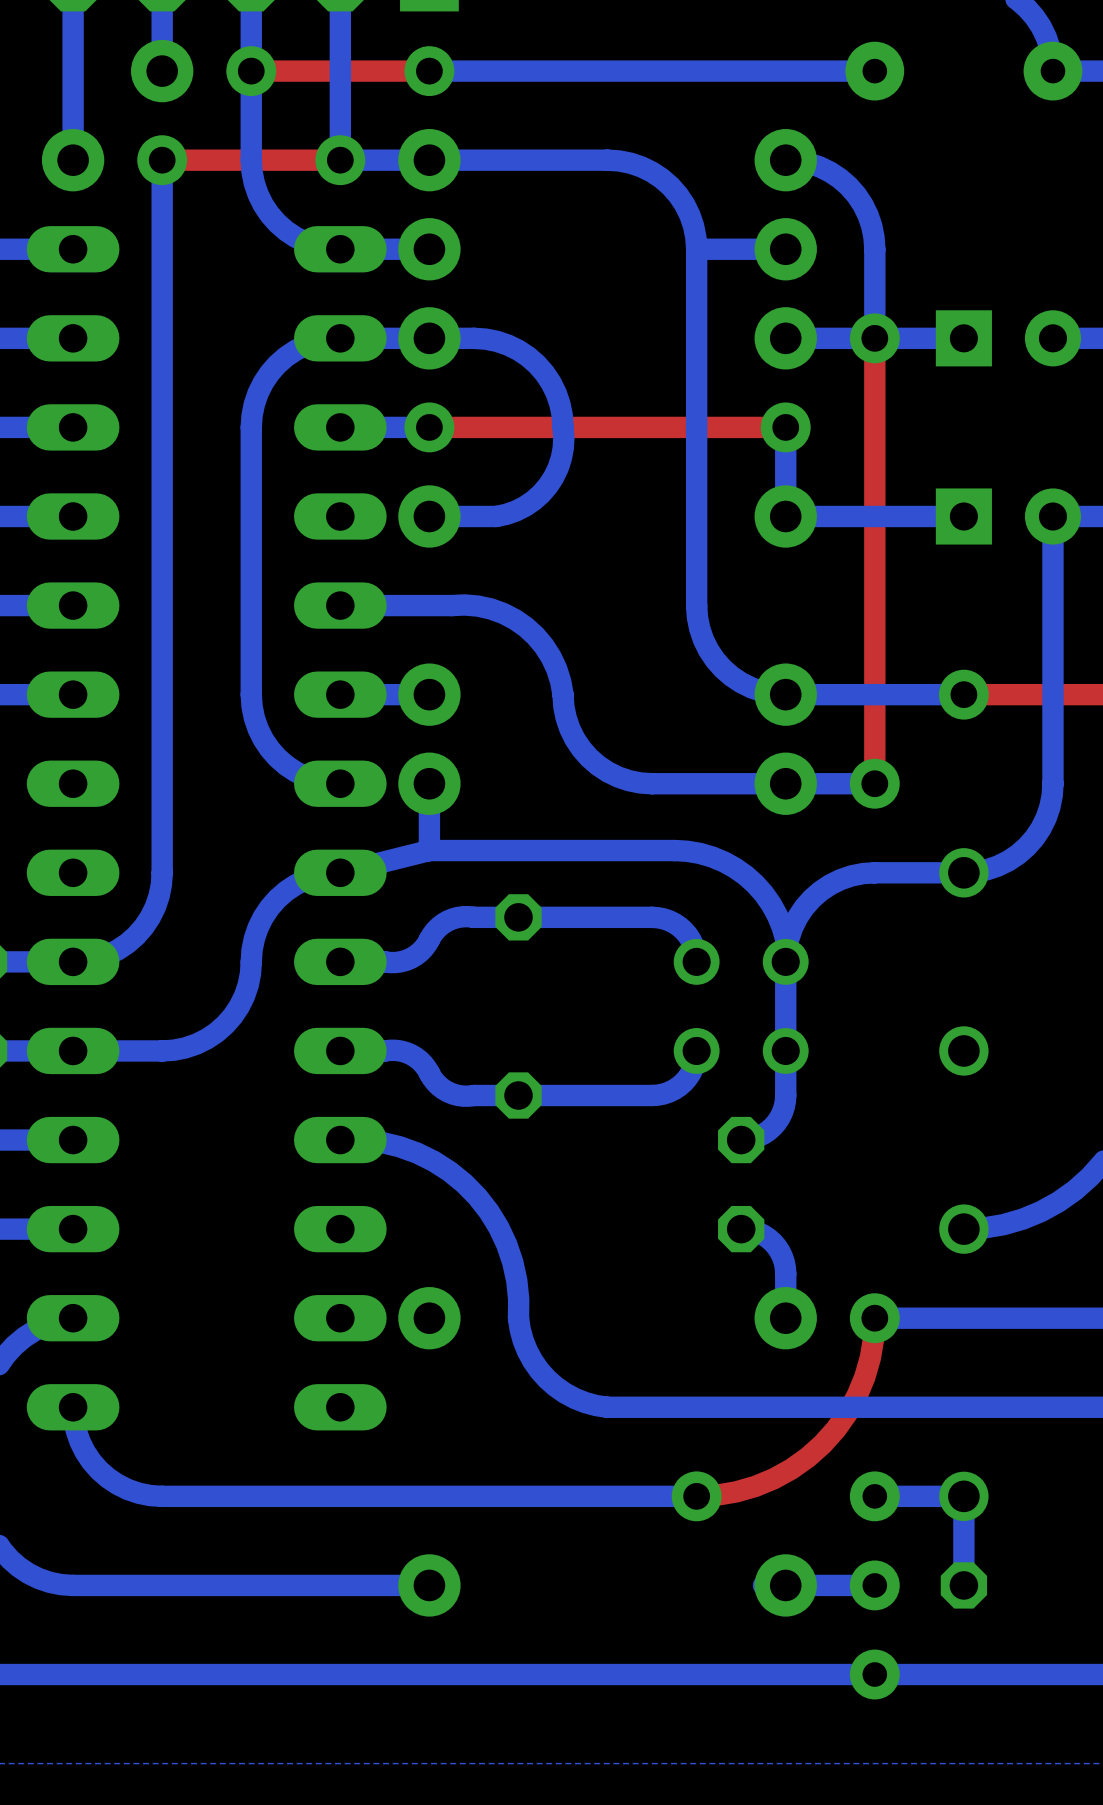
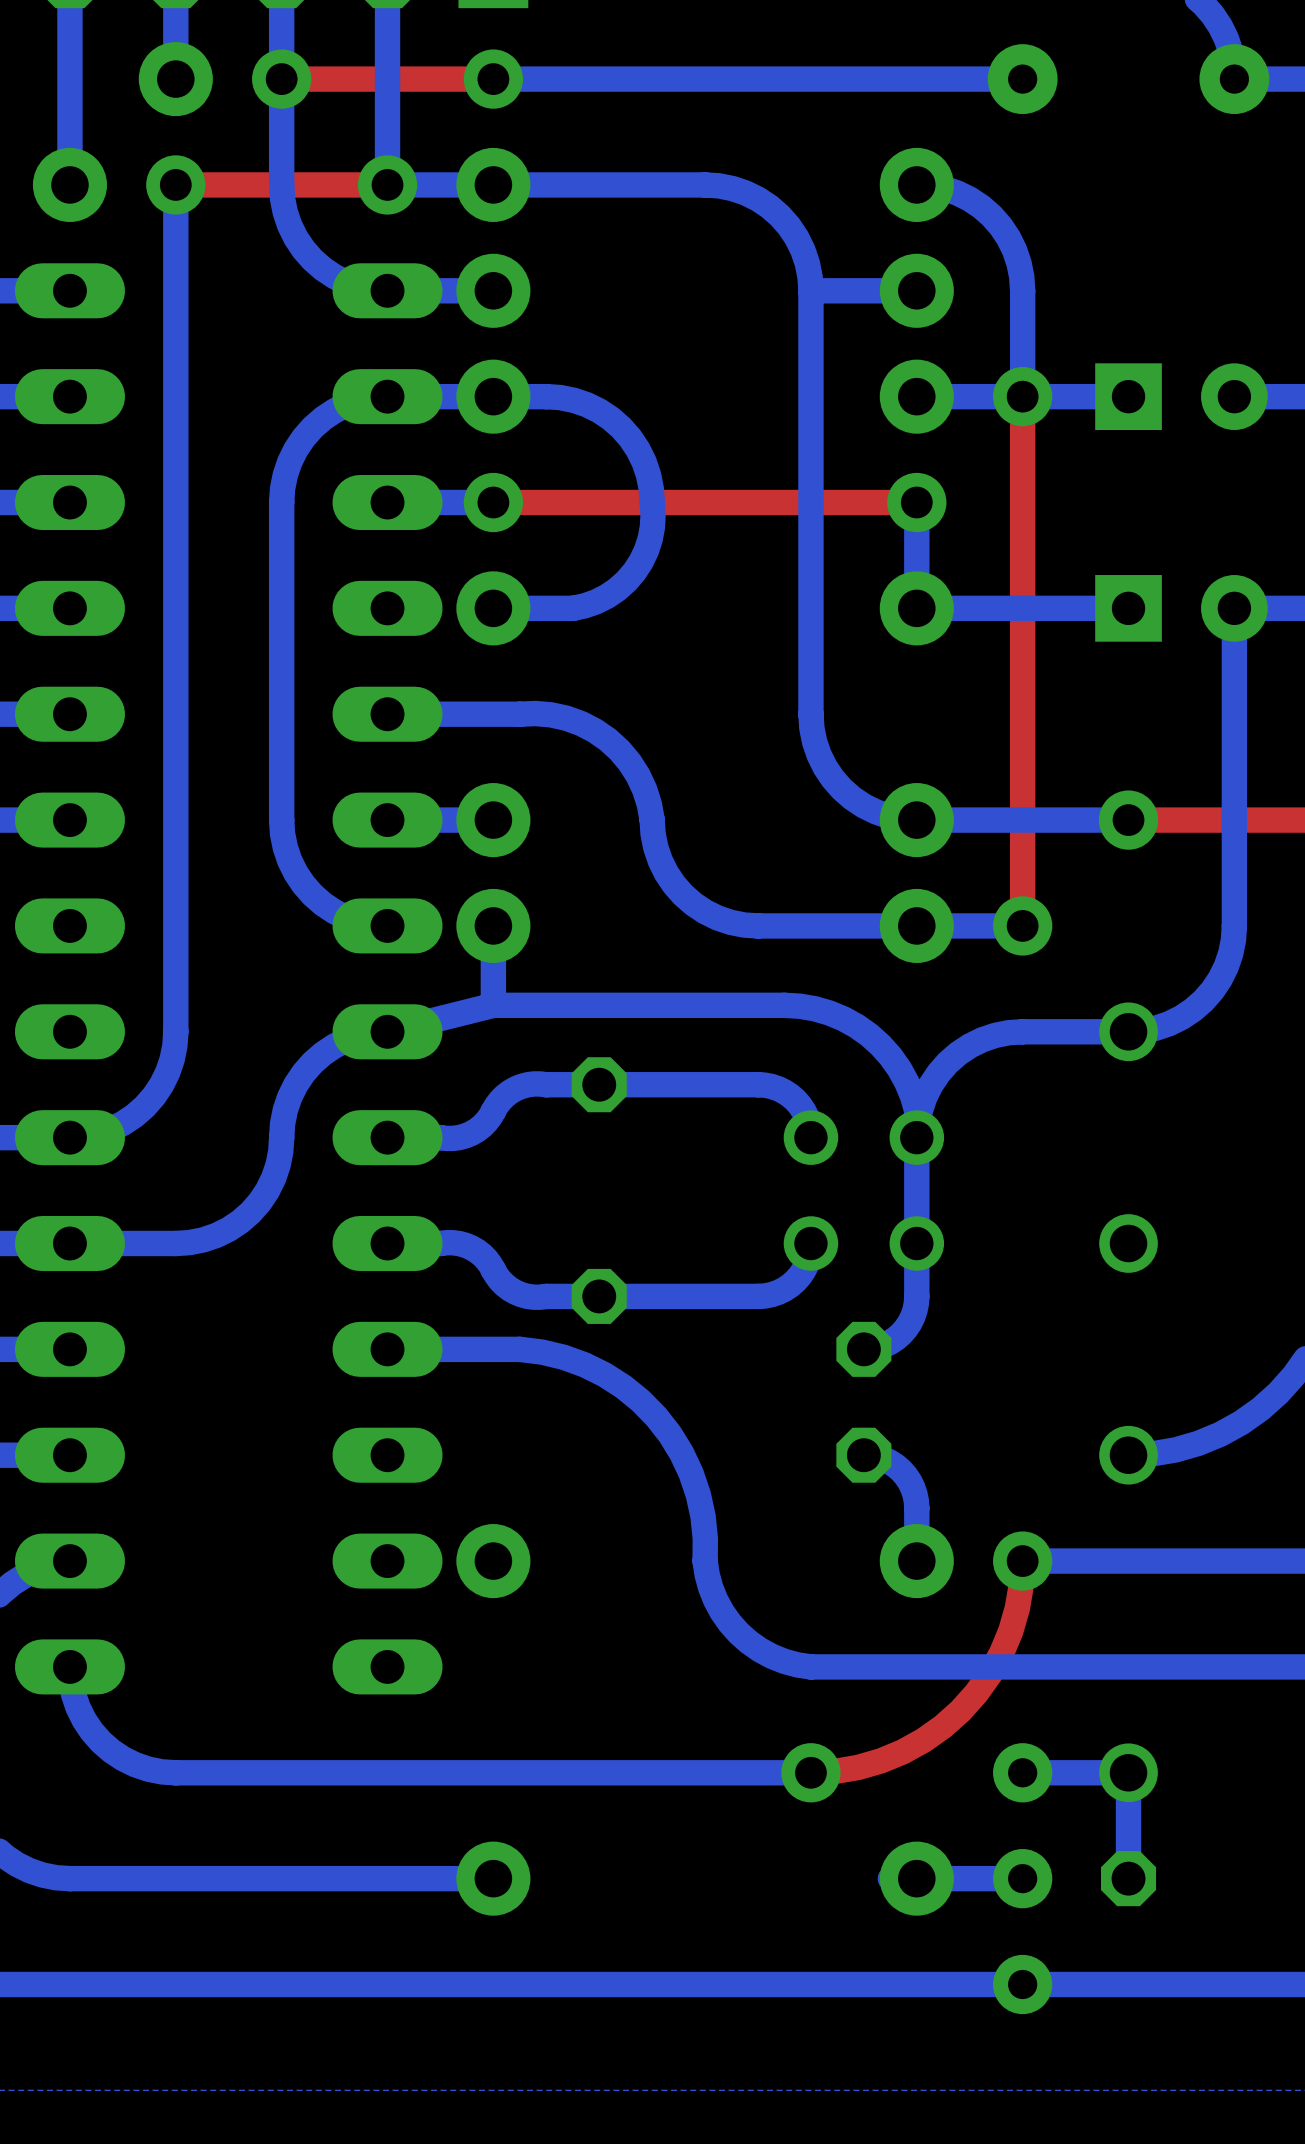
bottom track: (362, 1140) (399, 1146) (433, 1161) (464, 1183) (477, 1196) (498, 1227) (512, 1262) (516, 1280) (520, 1329) (527, 1351) (539, 1370) (555, 1386) (585, 1402) (607, 1407) (696, 1407) -> (413, 1349) (519, 1349) (541, 1352) (584, 1364) (623, 1386) (656, 1416) (681, 1453) (691, 1473) (703, 1516) (707, 1574) (715, 1600) (722, 1611) (738, 1633) (760, 1649) (784, 1661) (810, 1666)

